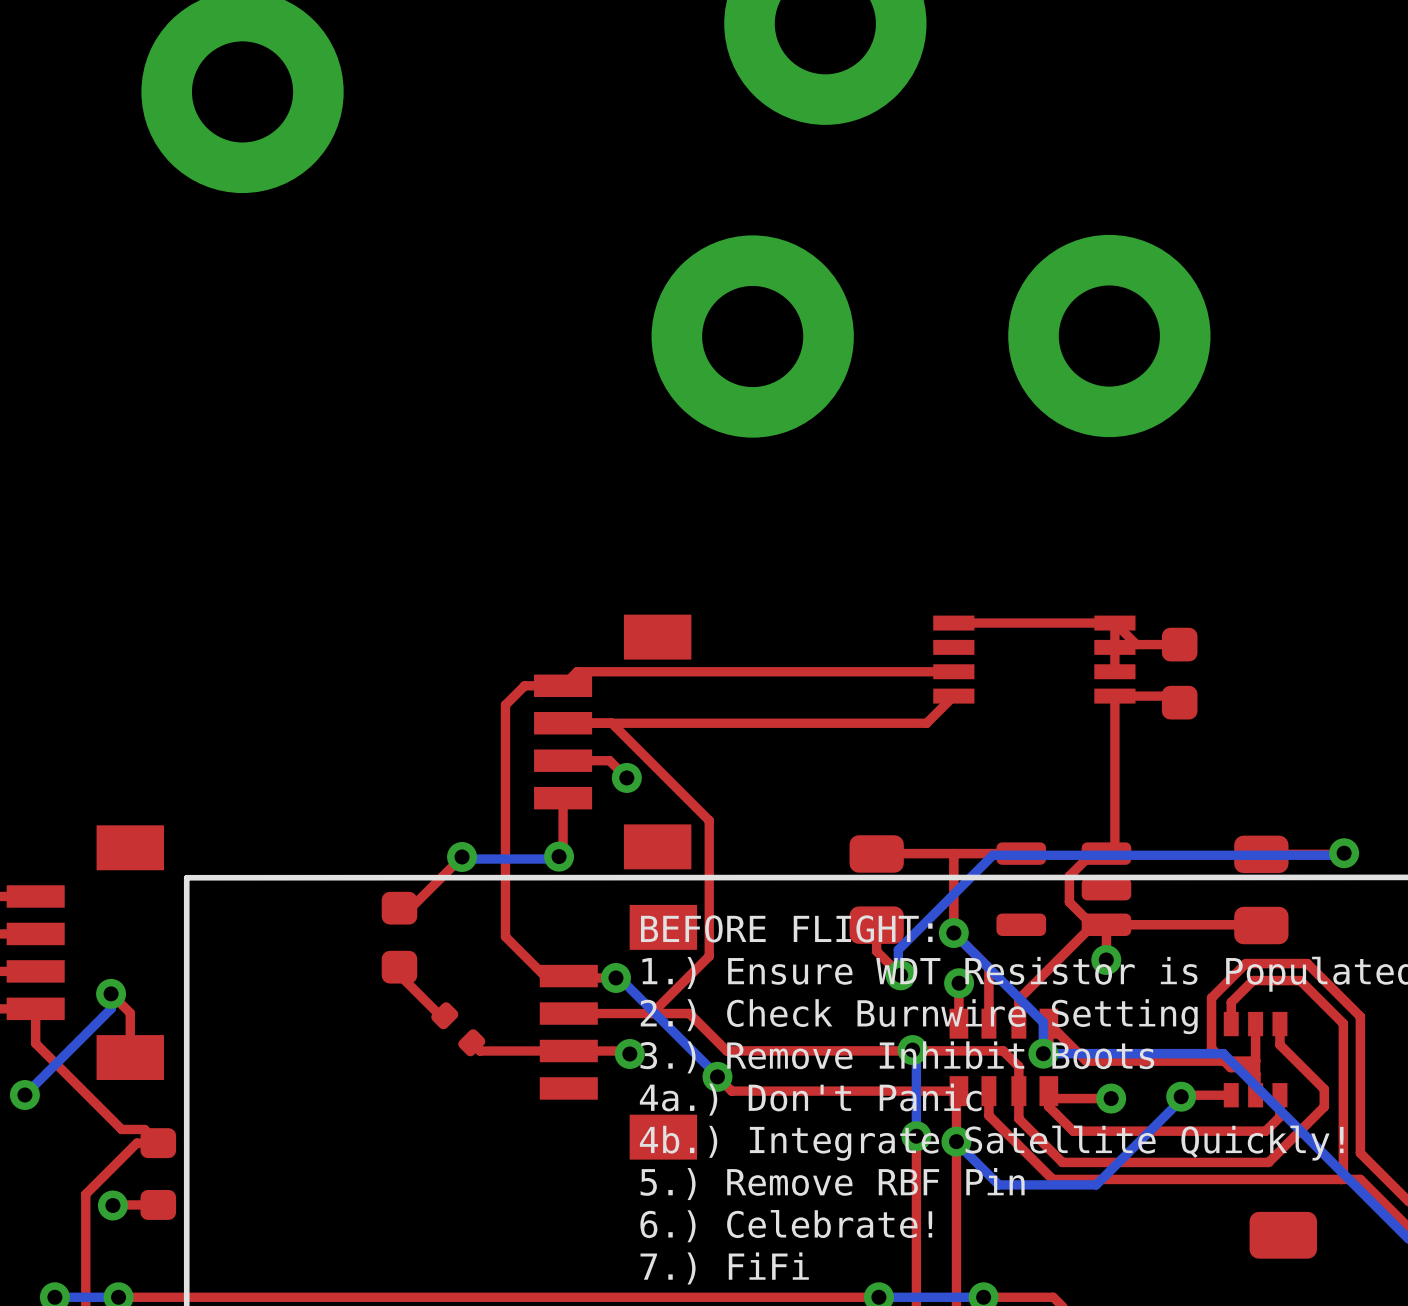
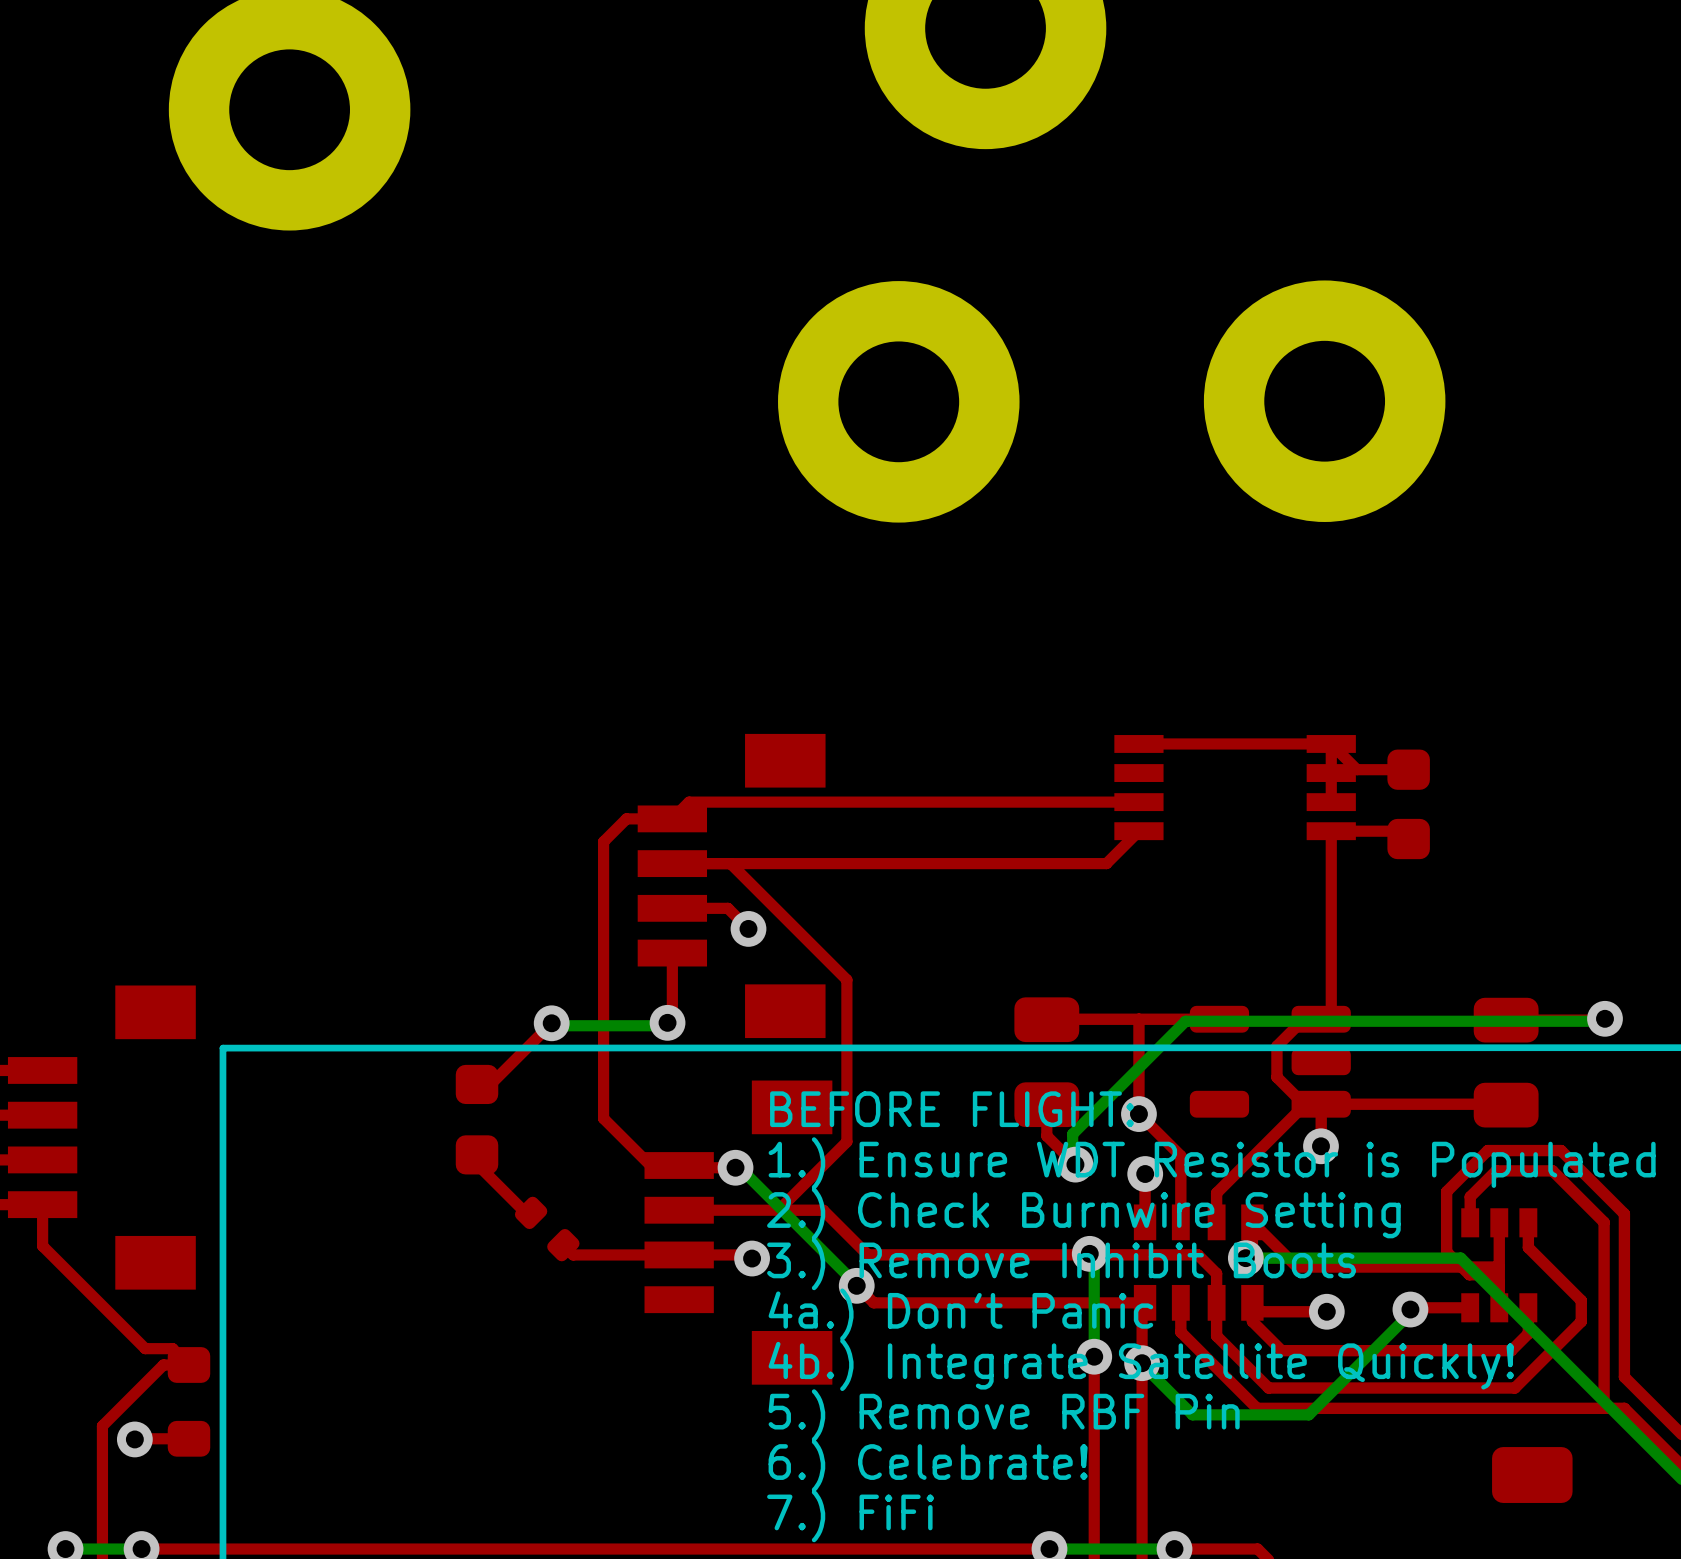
bottom track: (953, 933) (1043, 1022) (1043, 1053) -> none
top track: (111, 993) (130, 1013) (130, 1057) -> none
bottom track: (111, 993) (111, 1008) (24, 1095) -> none
via: (111, 993) -> none
via: (24, 1095) -> none

